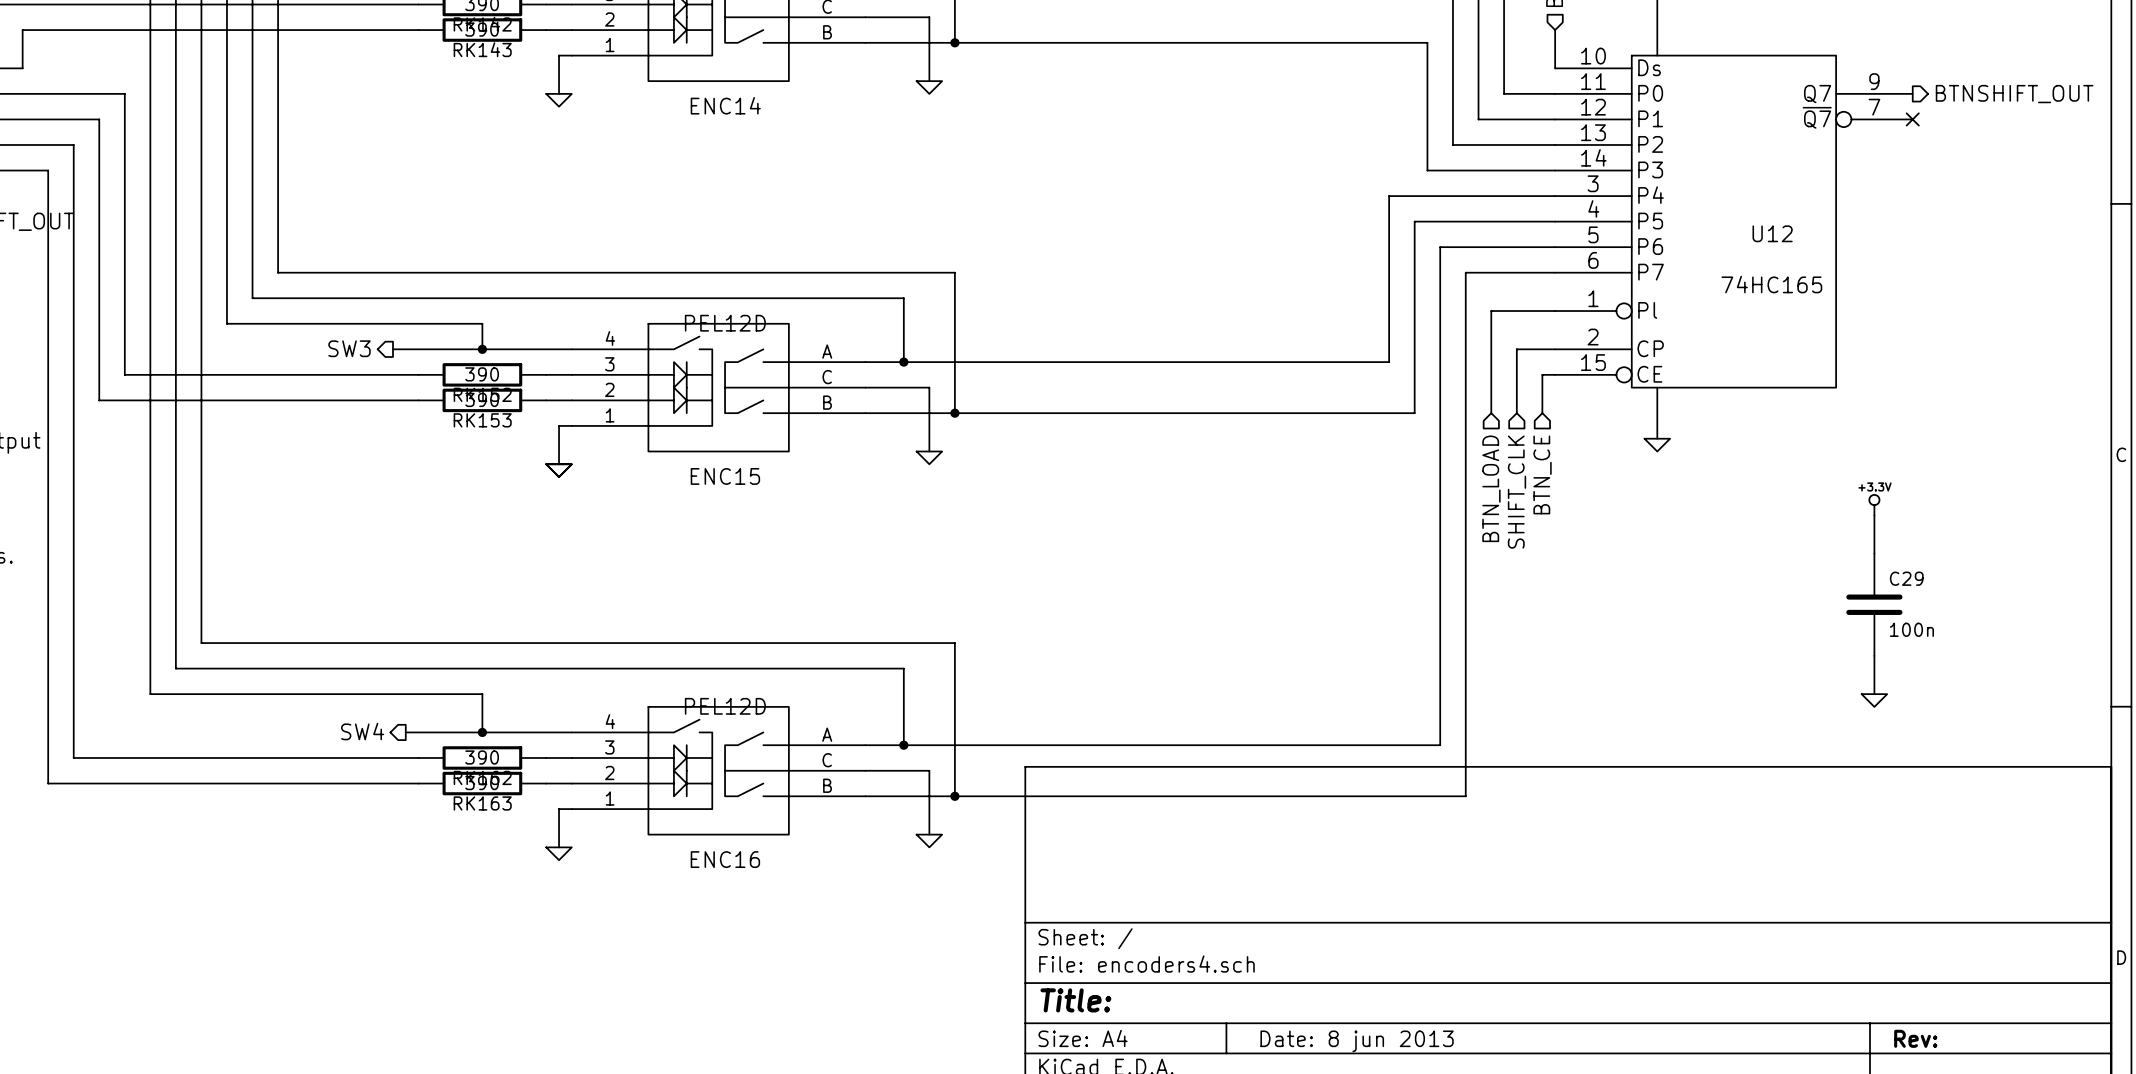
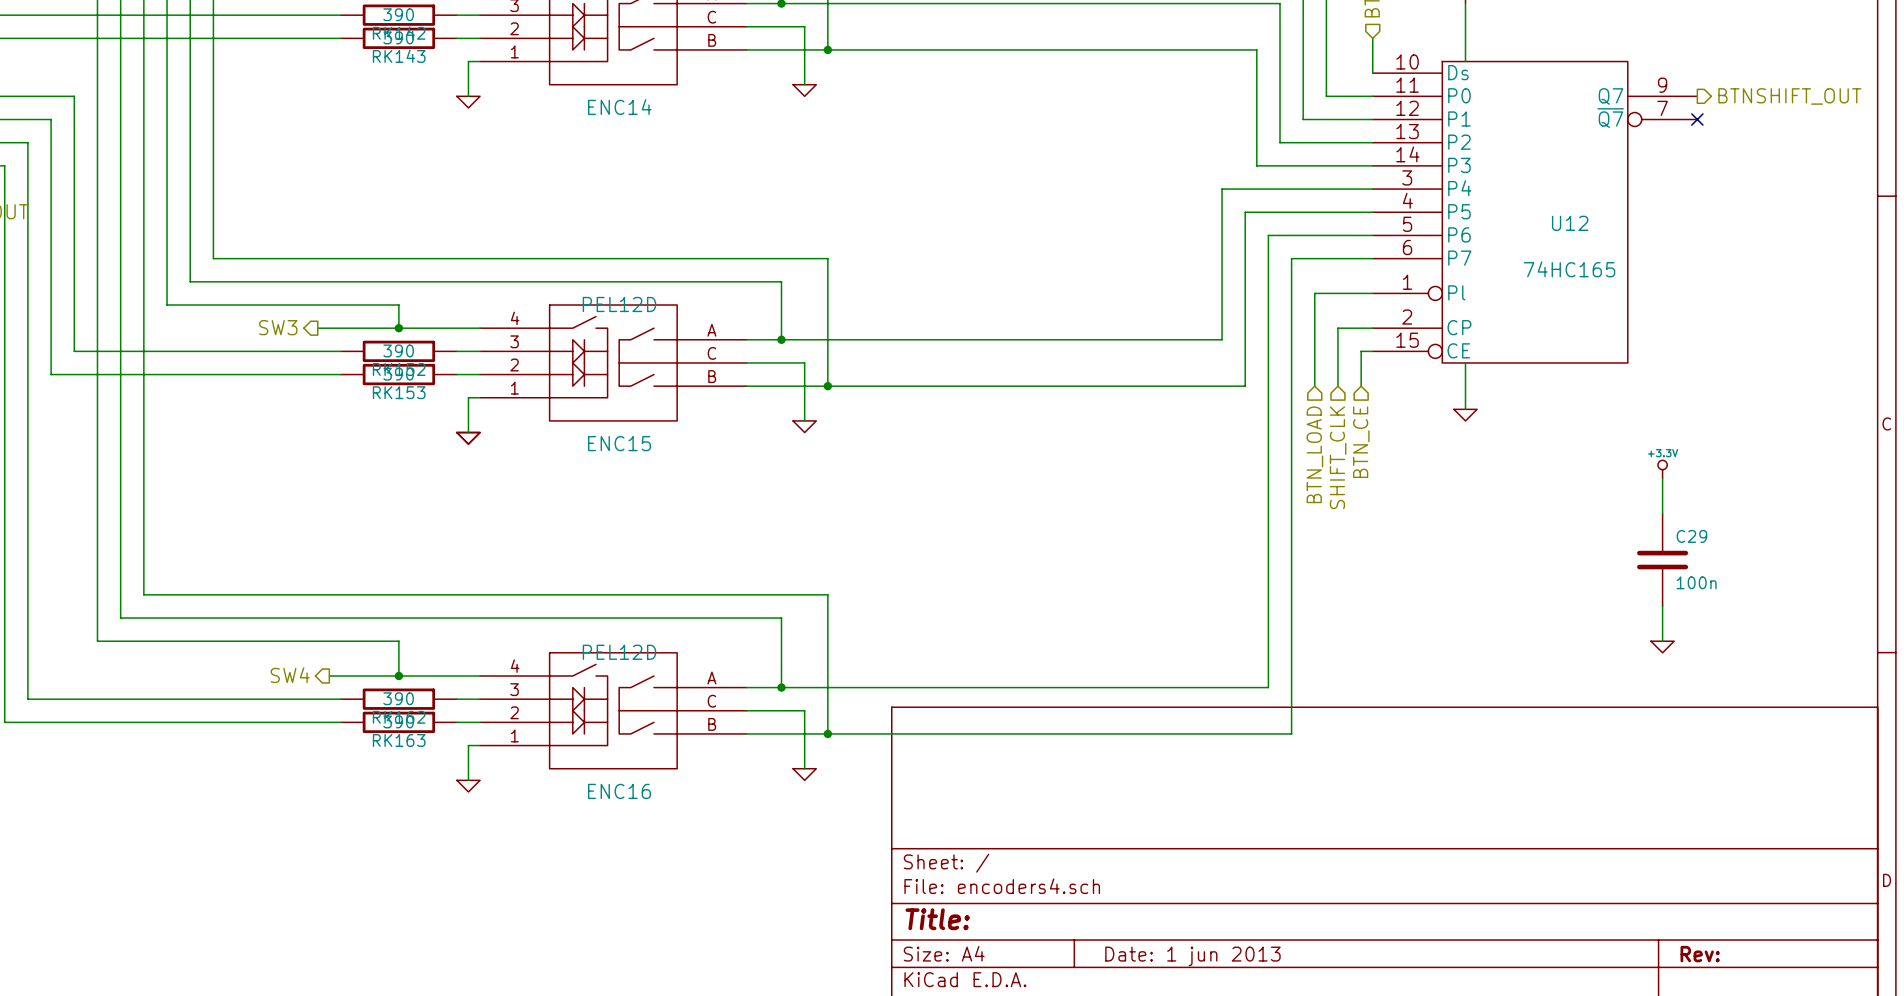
title block: Date: 8 jun 2013 (1357, 1041) -> Date: 1 jun 2013 (1192, 956)

